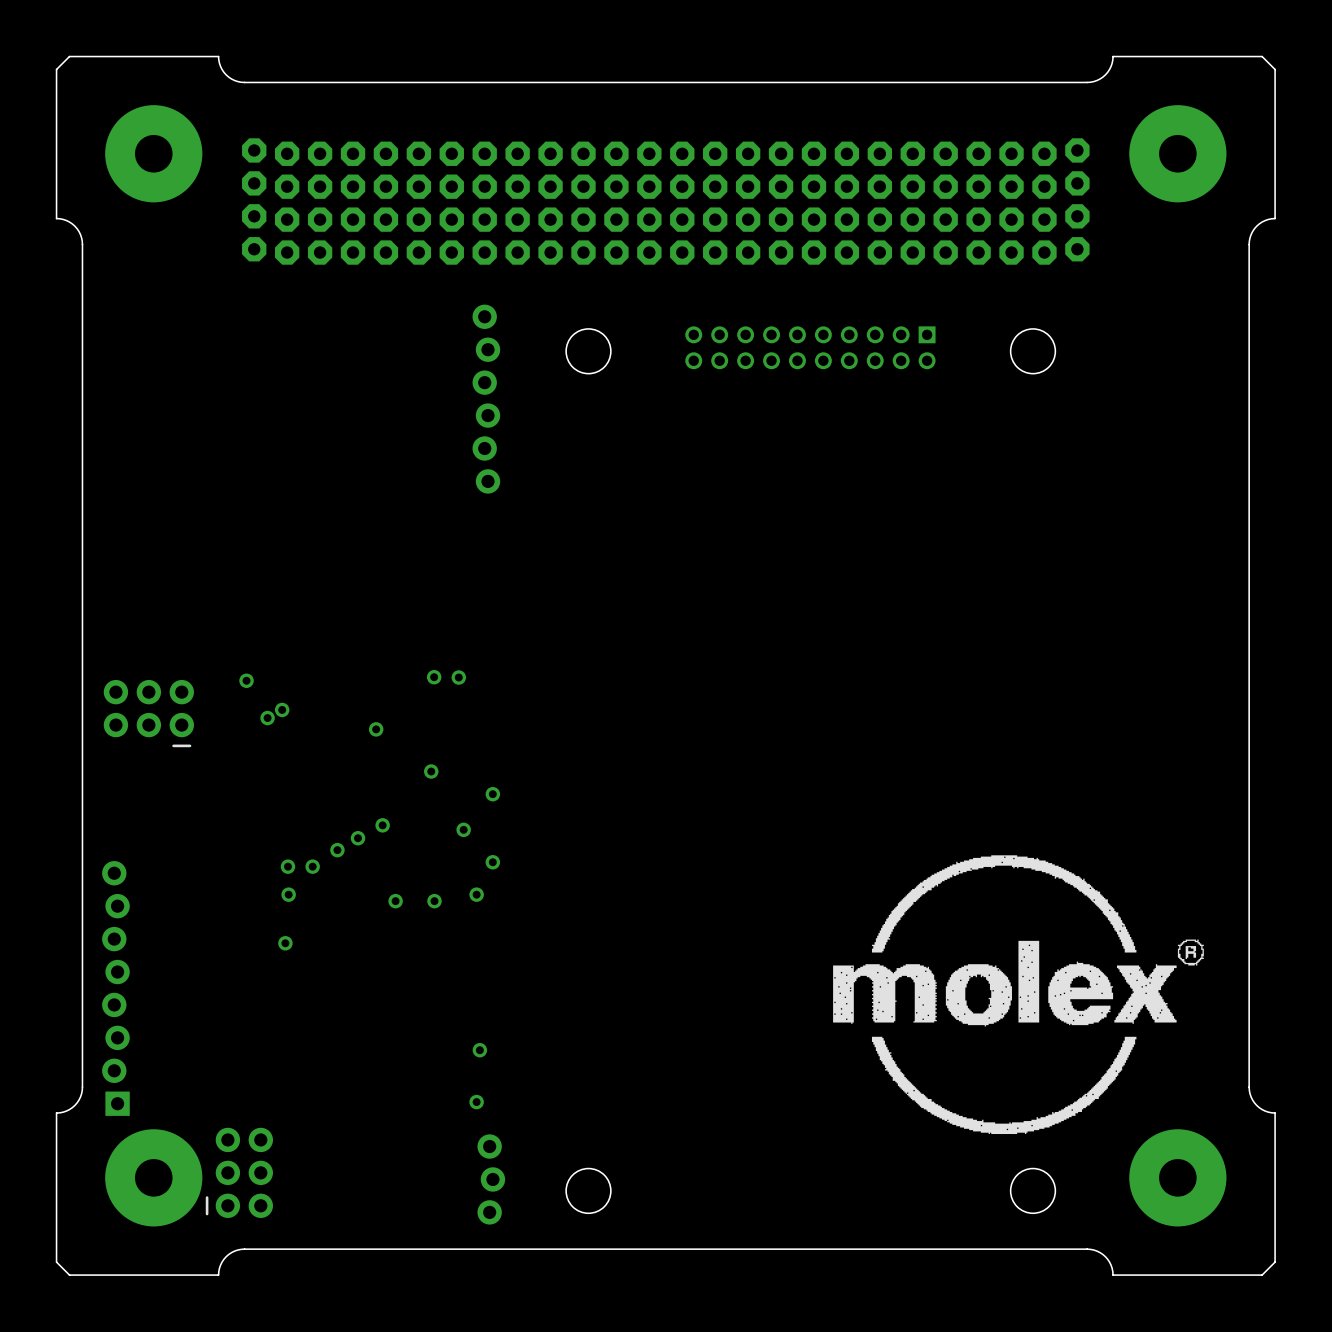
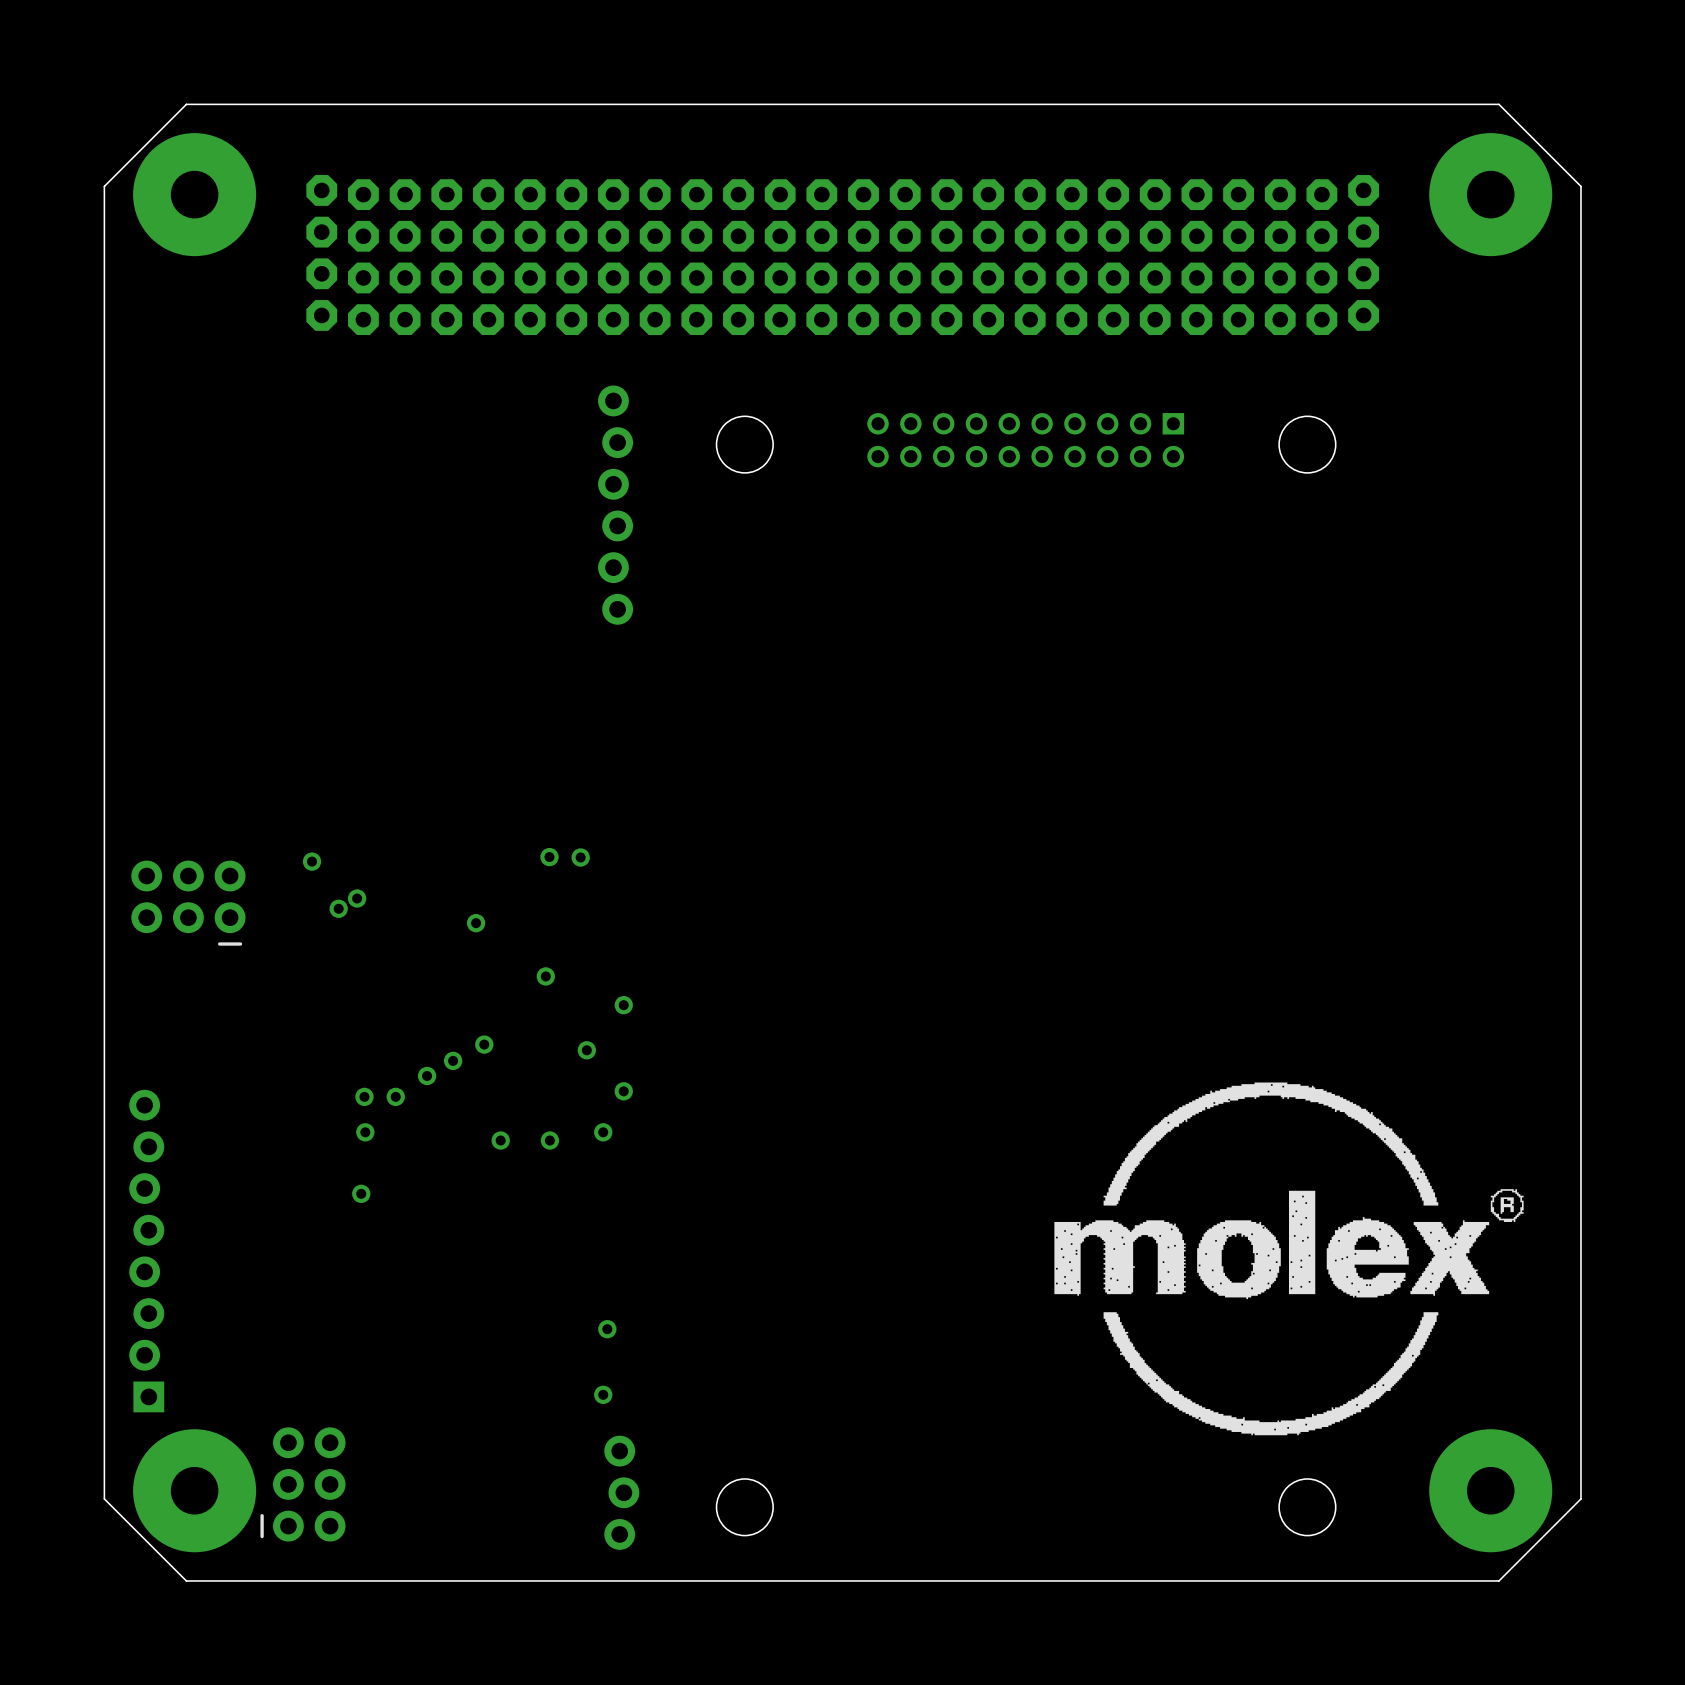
part footprint: [56, 56, 1276, 1276] -> [104, 104, 1581, 1581]

